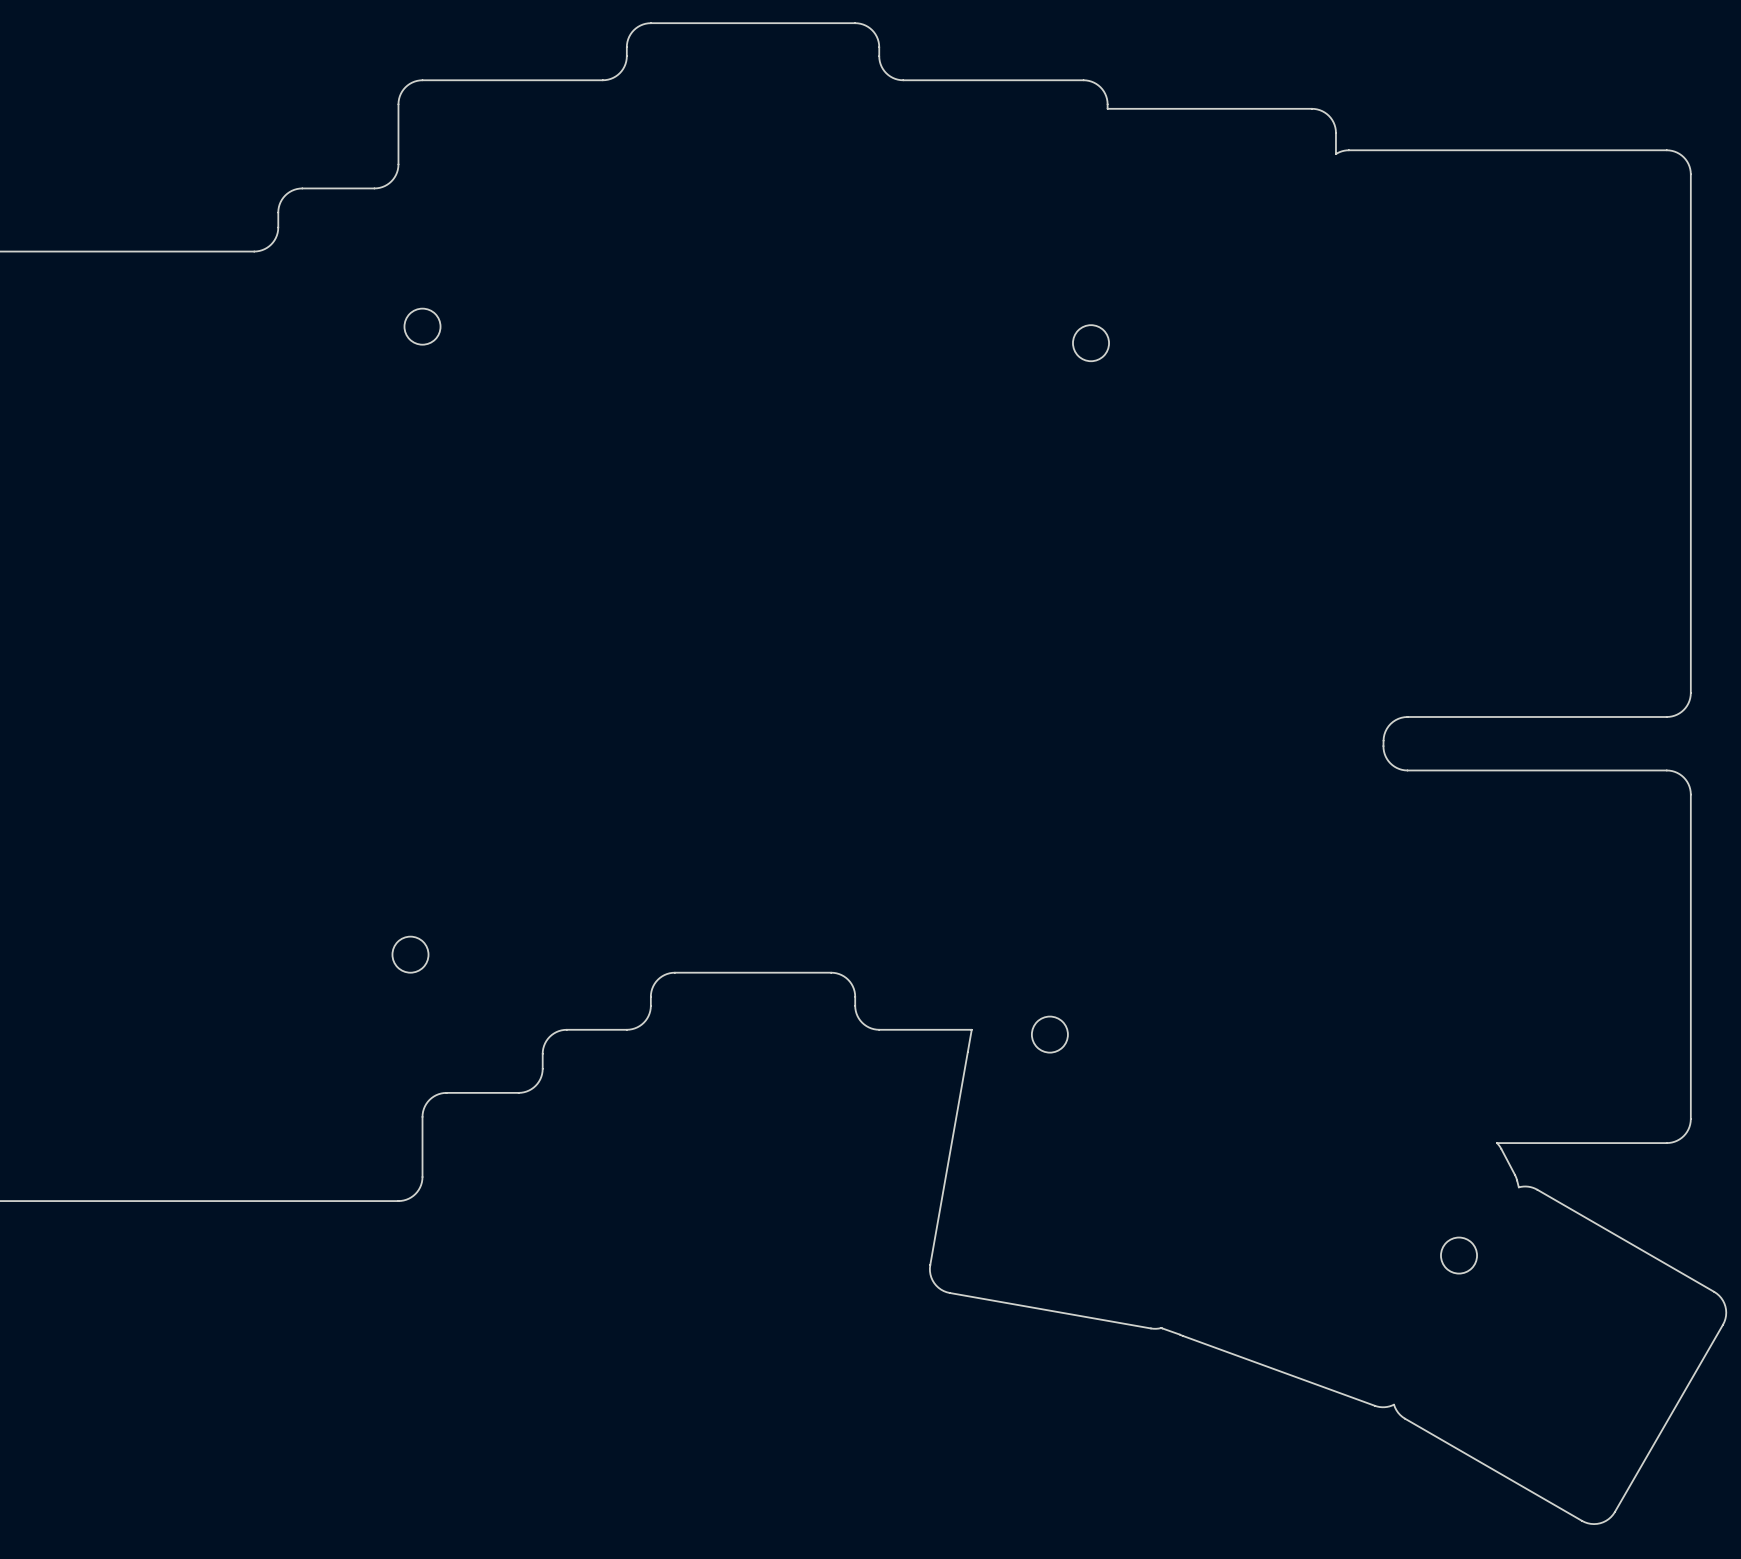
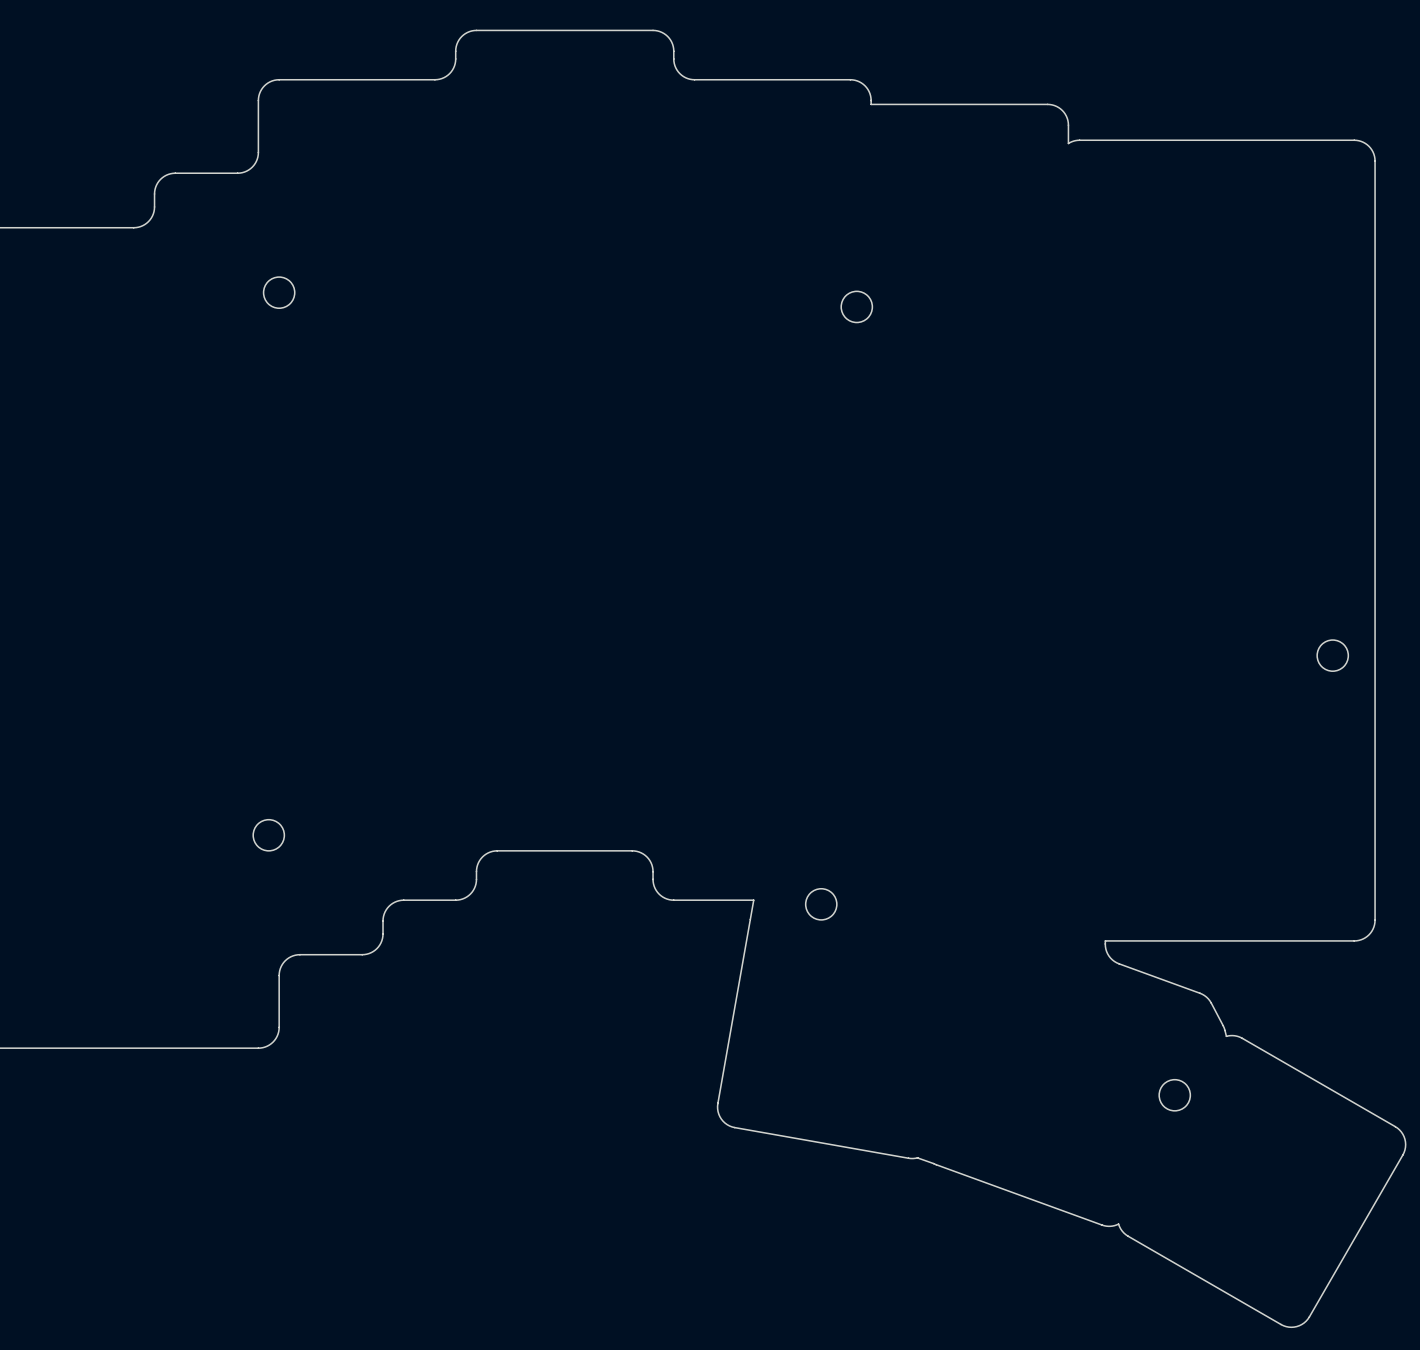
board edge: (1690, 692) (1685, 707) (1679, 713) (1669, 716) (1404, 717) (1395, 720) (1388, 726) (1384, 734) (1383, 746) (1385, 756) (1390, 763) (1404, 770) (1669, 770) (1677, 772) (1685, 779) (1690, 794) -> (1375, 609) (1375, 696)
round board edge: none -> [1316, 639, 1350, 672]
board edge: (1690, 1052) (1690, 1121) (1685, 1134) (1677, 1140) (1666, 1143) (1496, 1143) (1501, 1148) -> (1375, 920) (1370, 933) (1363, 938) (1356, 940) (1105, 940) (1107, 953) (1116, 962) (1200, 993) (1211, 1003)

